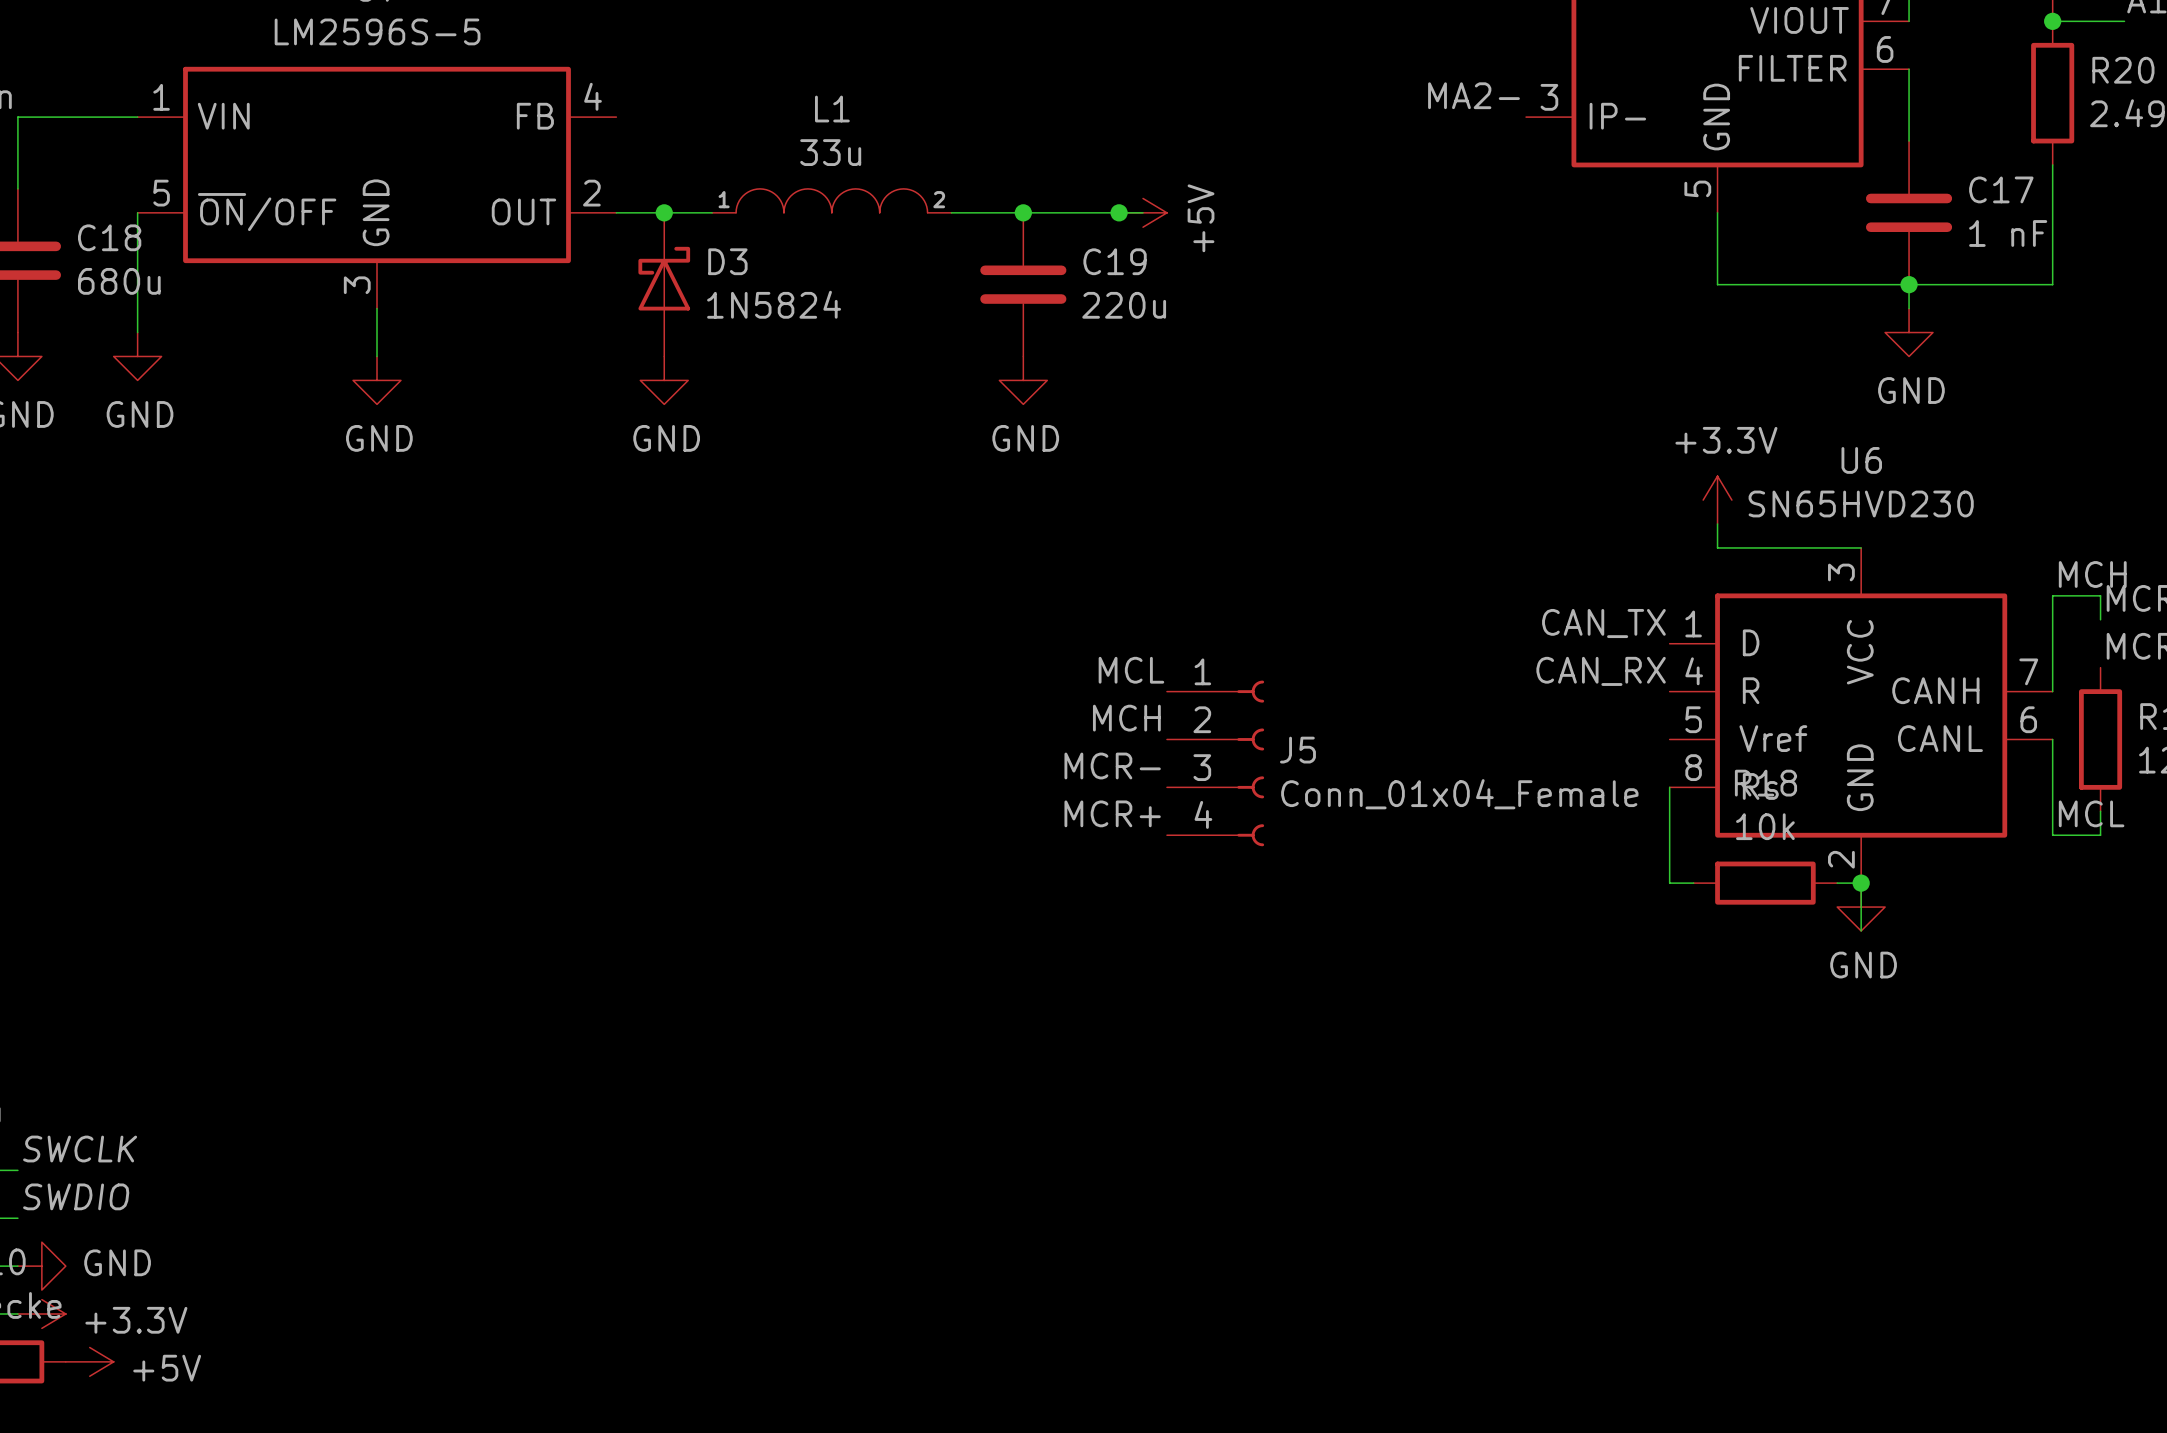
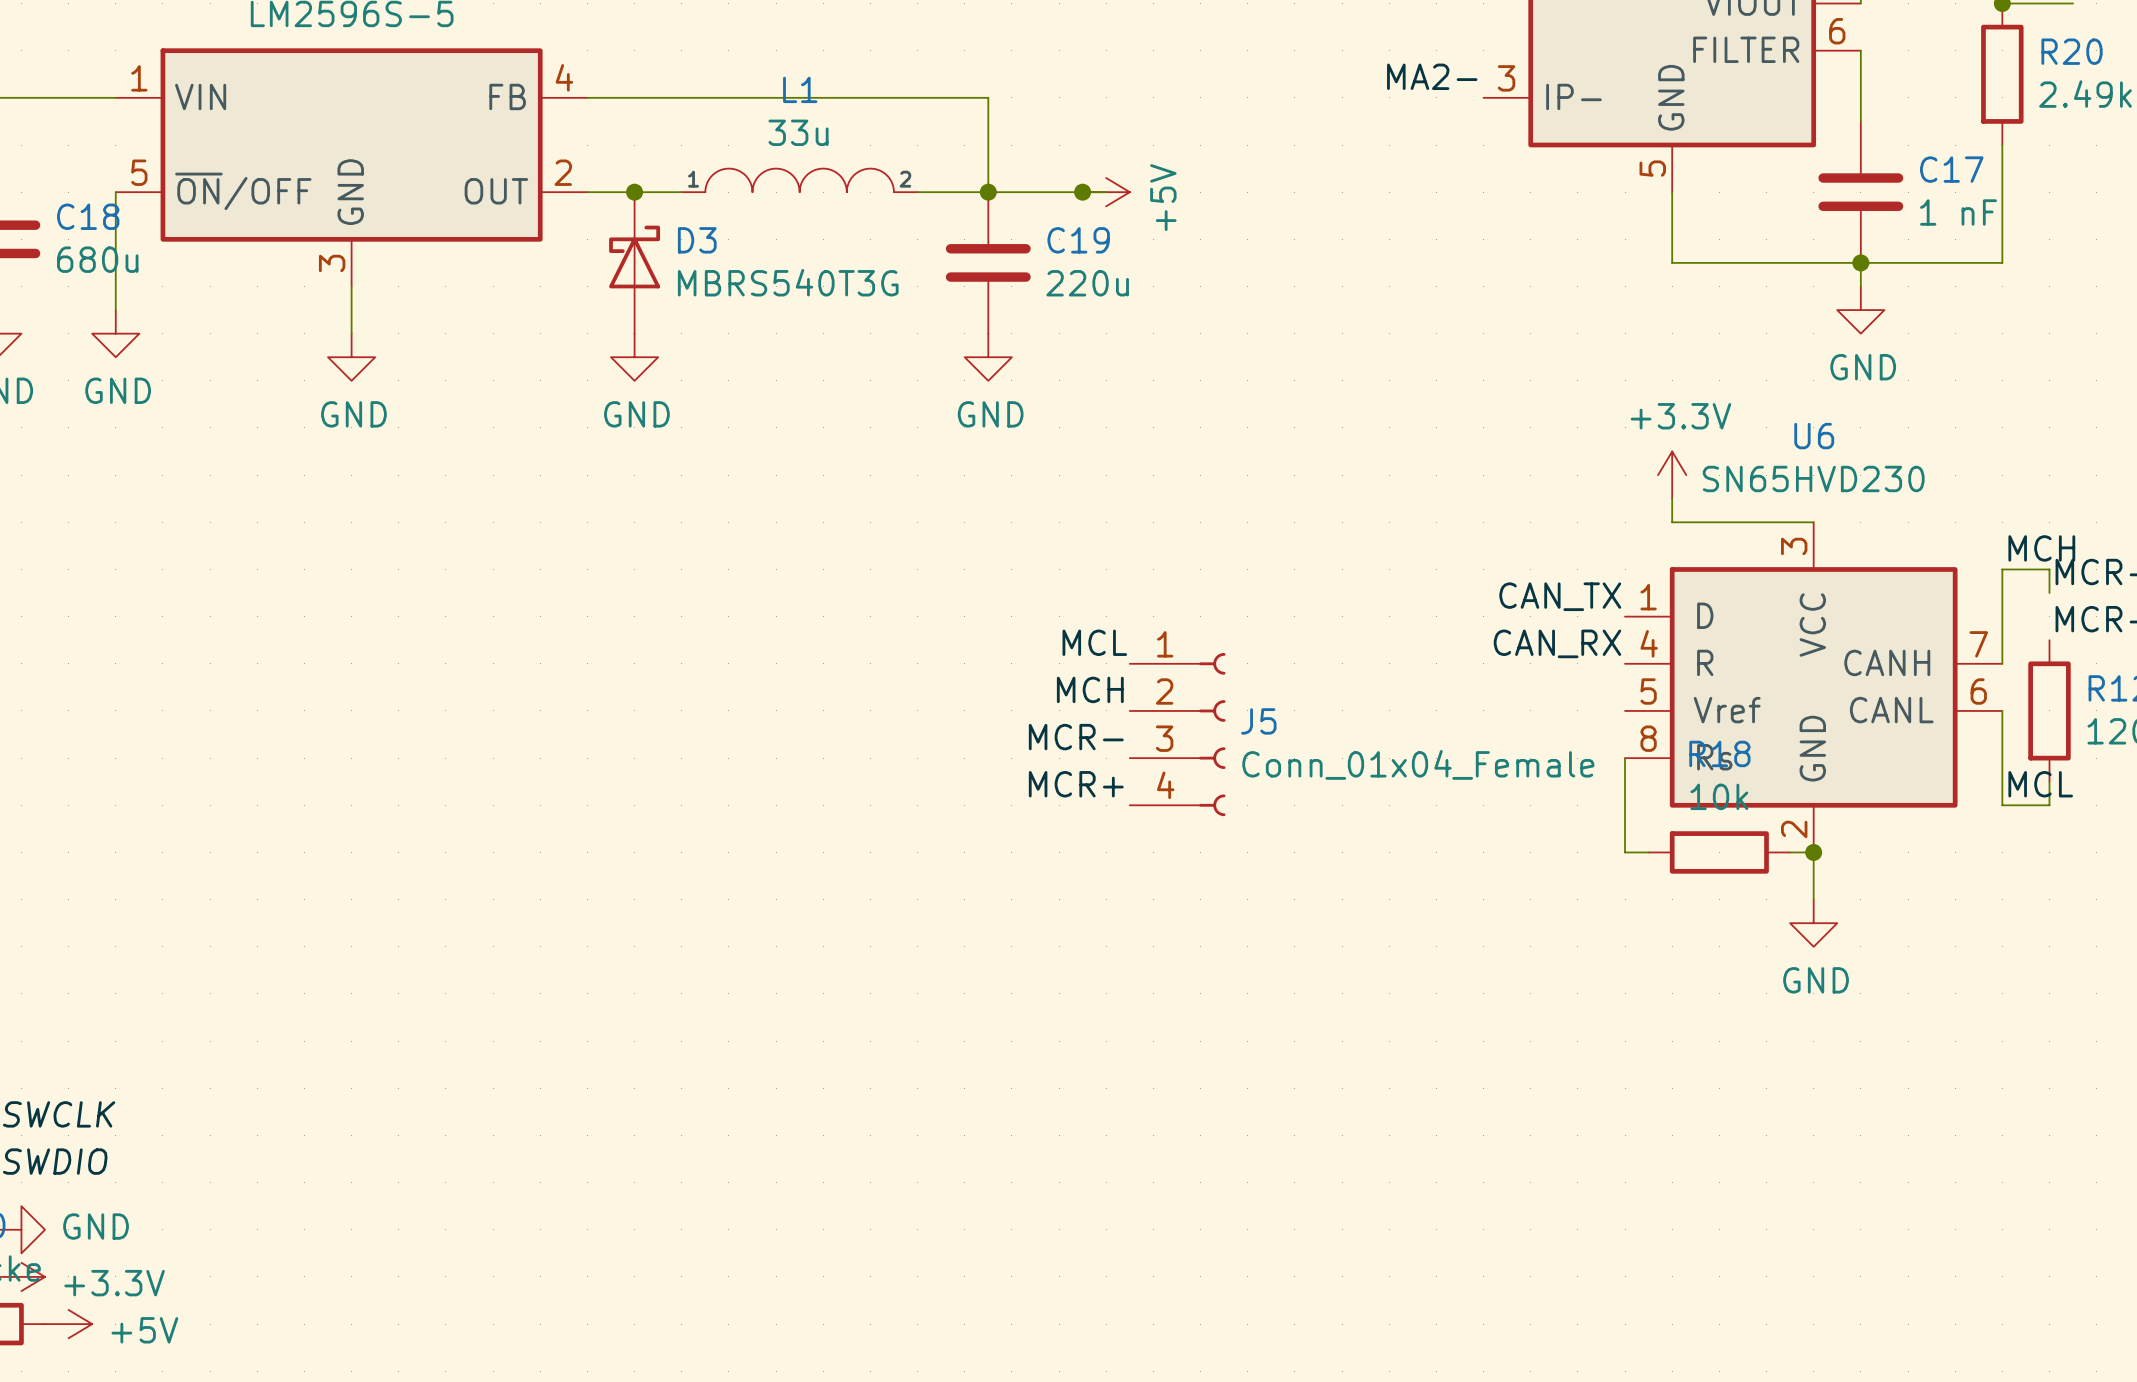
wire: none -> (587, 97) (988, 97) (988, 192)
D3 value: 1N5824 (774, 304) -> MBRS540T3G (788, 282)
power symbol position: GND (1861, 907) -> GND (1813, 923)

